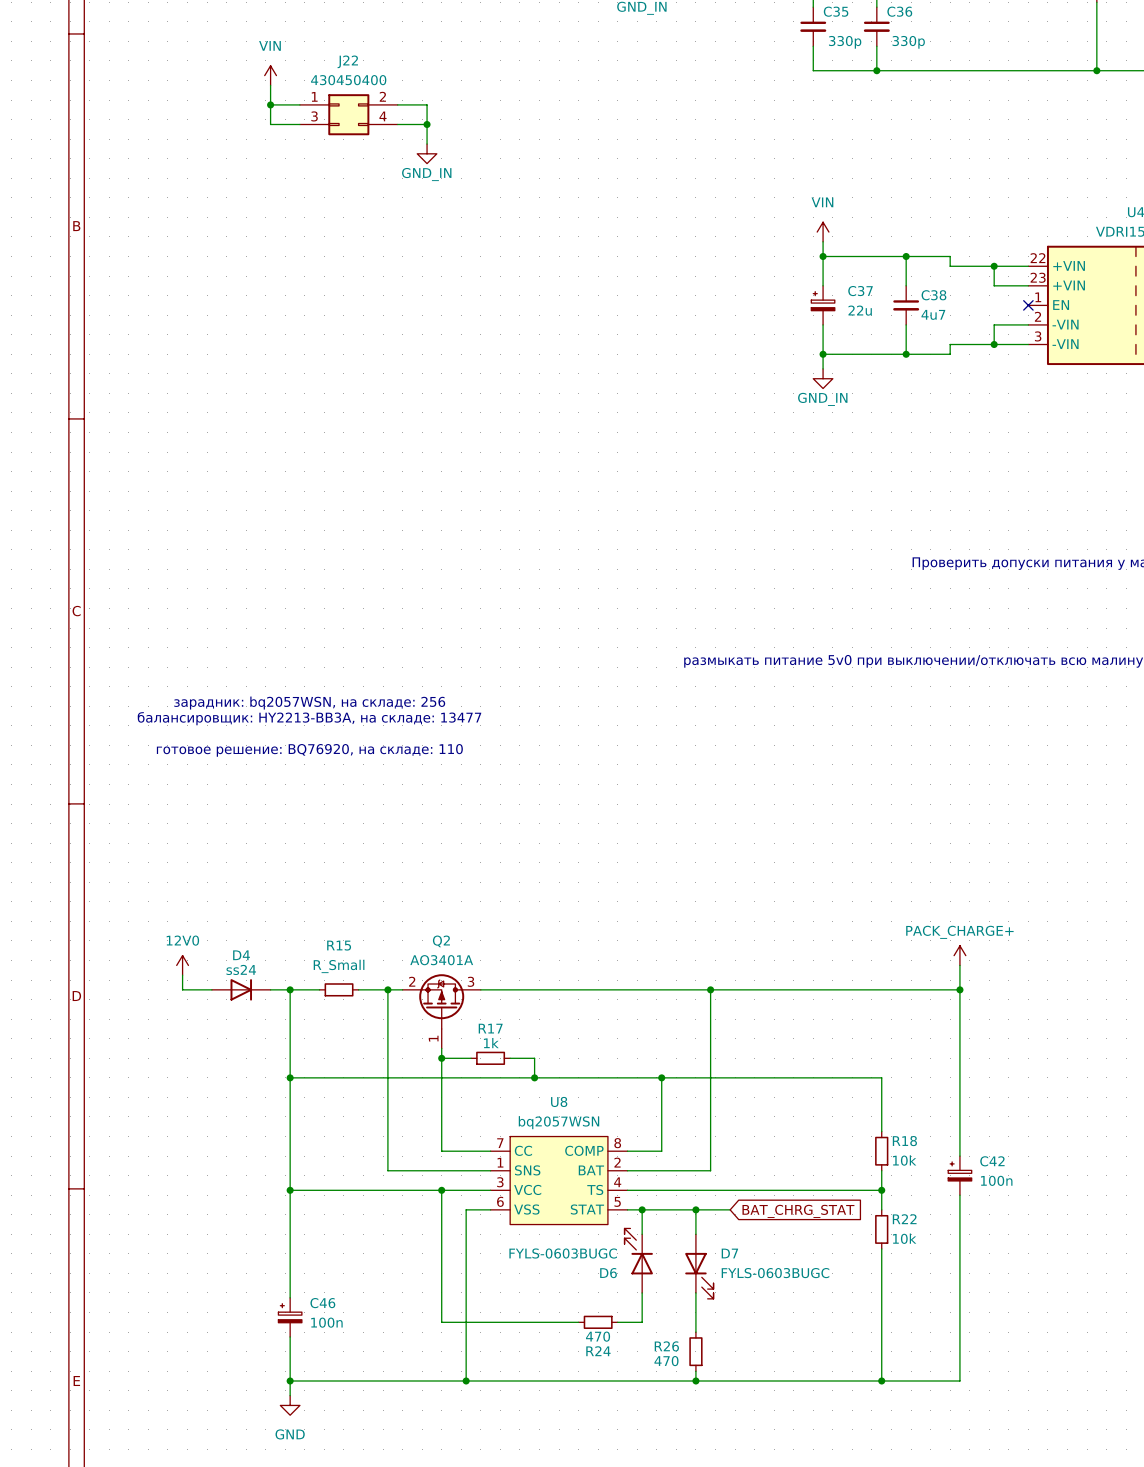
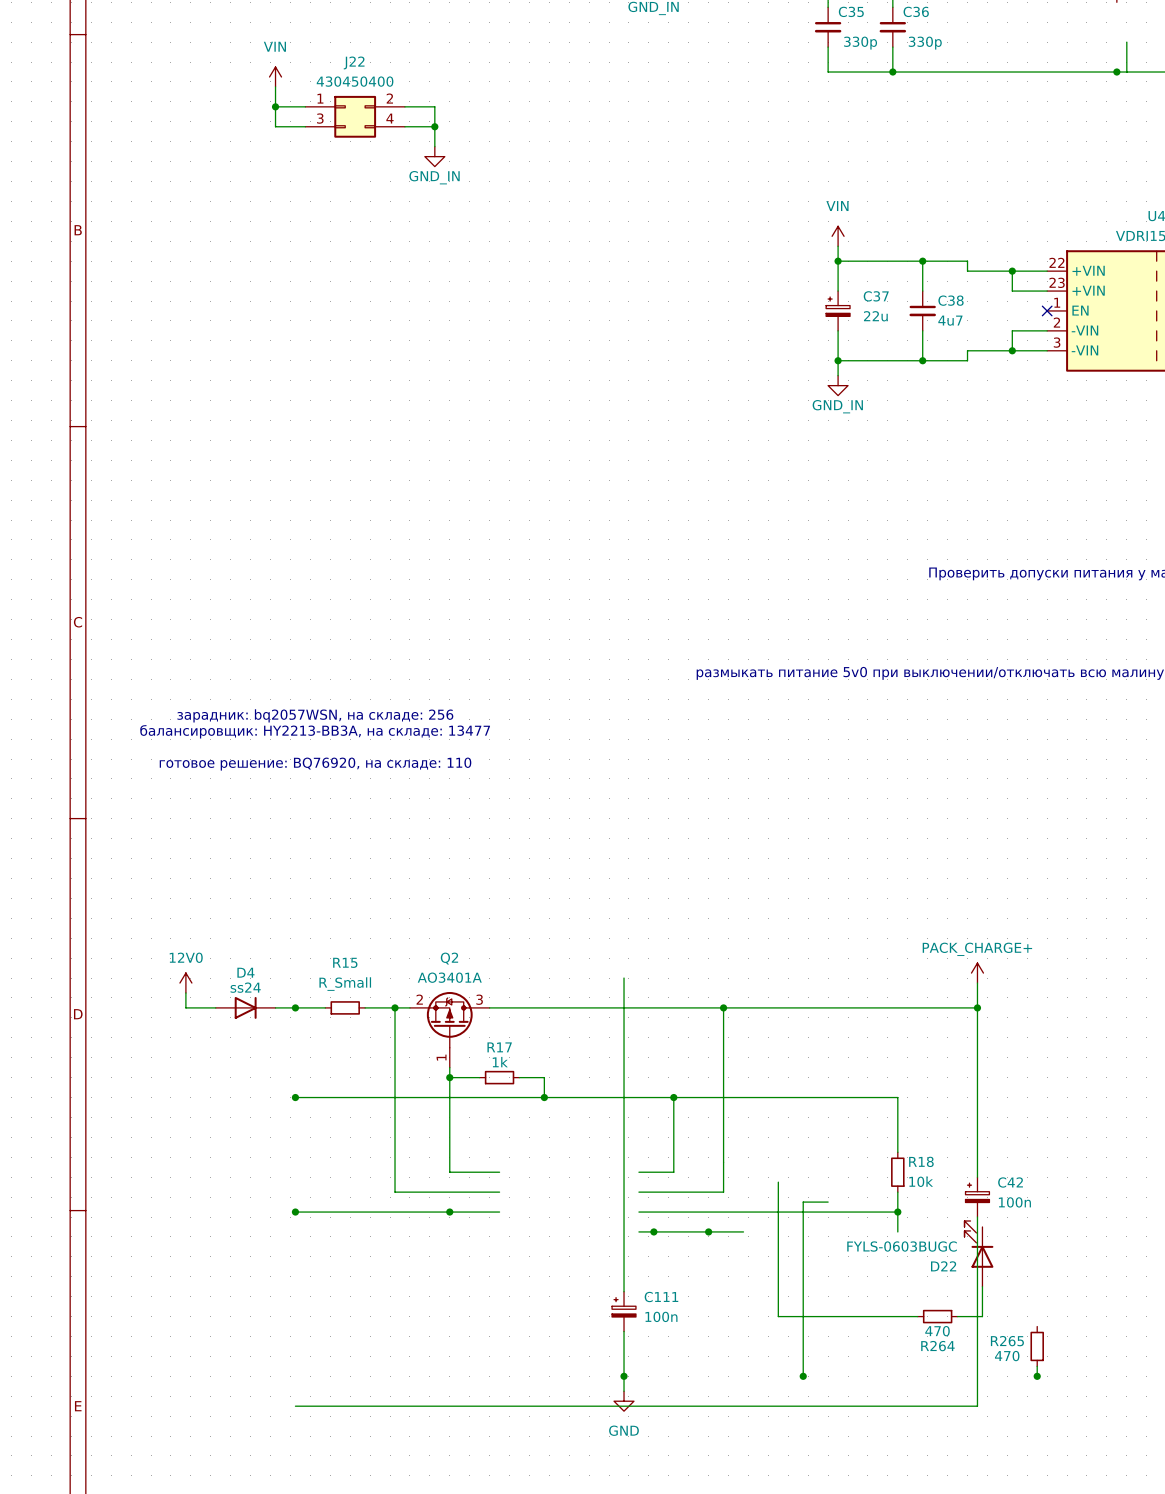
wire: (1096, 2) (1096, 70) -> none
wire: none -> (1126, 42) (1126, 72)
wire: none -> (624, 978) (624, 1291)
wire: (290, 989) (290, 1297) -> none
wire: none -> (778, 1182) (778, 1316) (917, 1316)
U8: bq2057WSN (559, 1180) -> none
wire: none -> (828, 1202) (803, 1202) (803, 1376)
wire: (441, 1190) (441, 1322) (578, 1322) -> none
wire: (490, 1209) (466, 1209) (466, 1380) -> none
wire: (642, 1209) (642, 1234) -> none
wire: (695, 1209) (695, 1234) -> none
global label: BAT_CHRG_STAT (798, 1211) -> none
R22: 10k (881, 1229) -> none
D22: none -> FYLS-0603BUGC (978, 1253)
wire: (881, 1248) (881, 1380) -> none
D6: FYLS-0603BUGC (638, 1260) -> none
wire: none -> (982, 1286) (982, 1316) (957, 1316)
D7: FYLS-0603BUGC (699, 1266) -> none
C111: none -> 100n (624, 1311)
wire: (642, 1292) (642, 1322) (617, 1322) -> none
wire: (695, 1292) (695, 1332) -> none
R264: none -> 470 (937, 1316)
wire: none -> (624, 1331) (624, 1391)
C46: 100n (290, 1317) -> none
R24: 470 (598, 1322) -> none
R265: none -> 470 (1037, 1346)
wire: (290, 1336) (290, 1395) -> none
wire: none -> (1037, 1366) (1037, 1376)
junction: none -> (624, 1376)
R26: 470 (695, 1351) -> none
junction: none -> (803, 1376)
junction: none -> (1037, 1376)
wire: (695, 1371) (695, 1380) -> none
power symbol: none -> GND (624, 1401)
junction: (290, 1380) -> none
junction: (466, 1380) -> none
junction: (695, 1380) -> none
junction: (881, 1380) -> none
power symbol: GND (290, 1405) -> none

